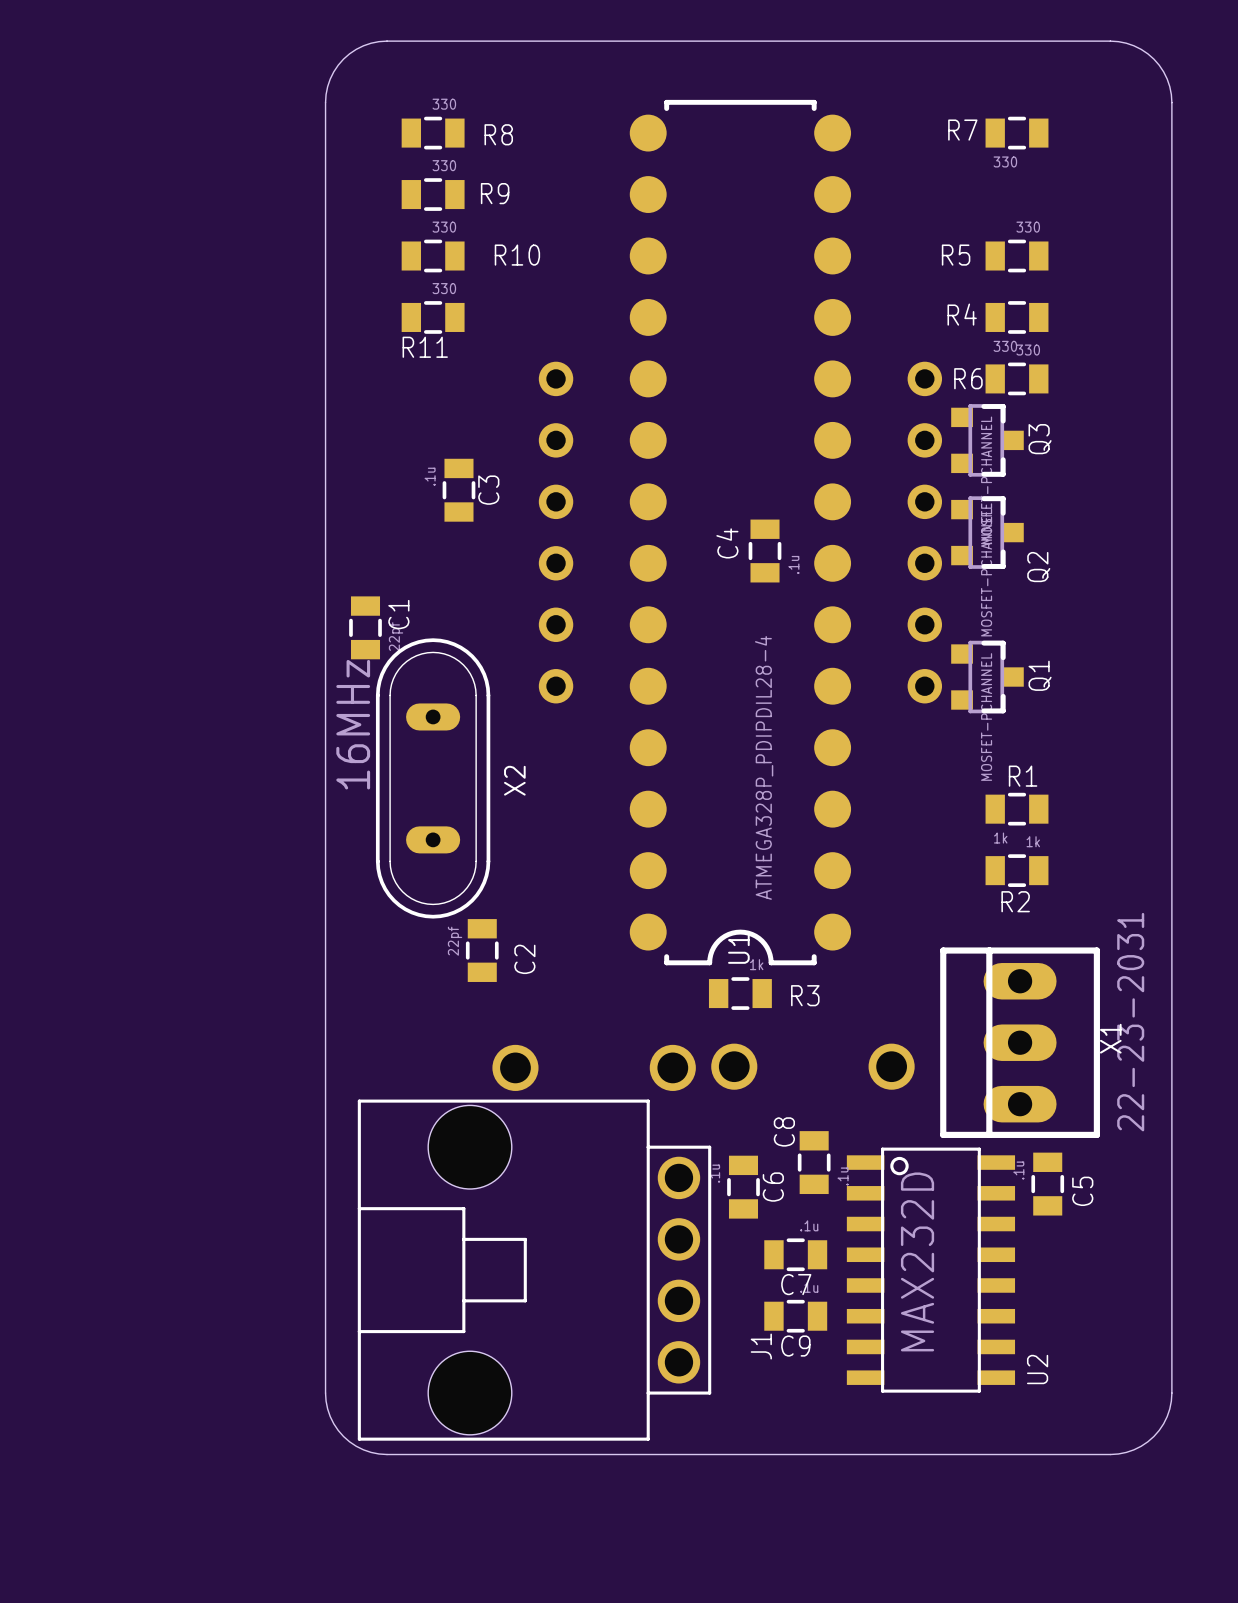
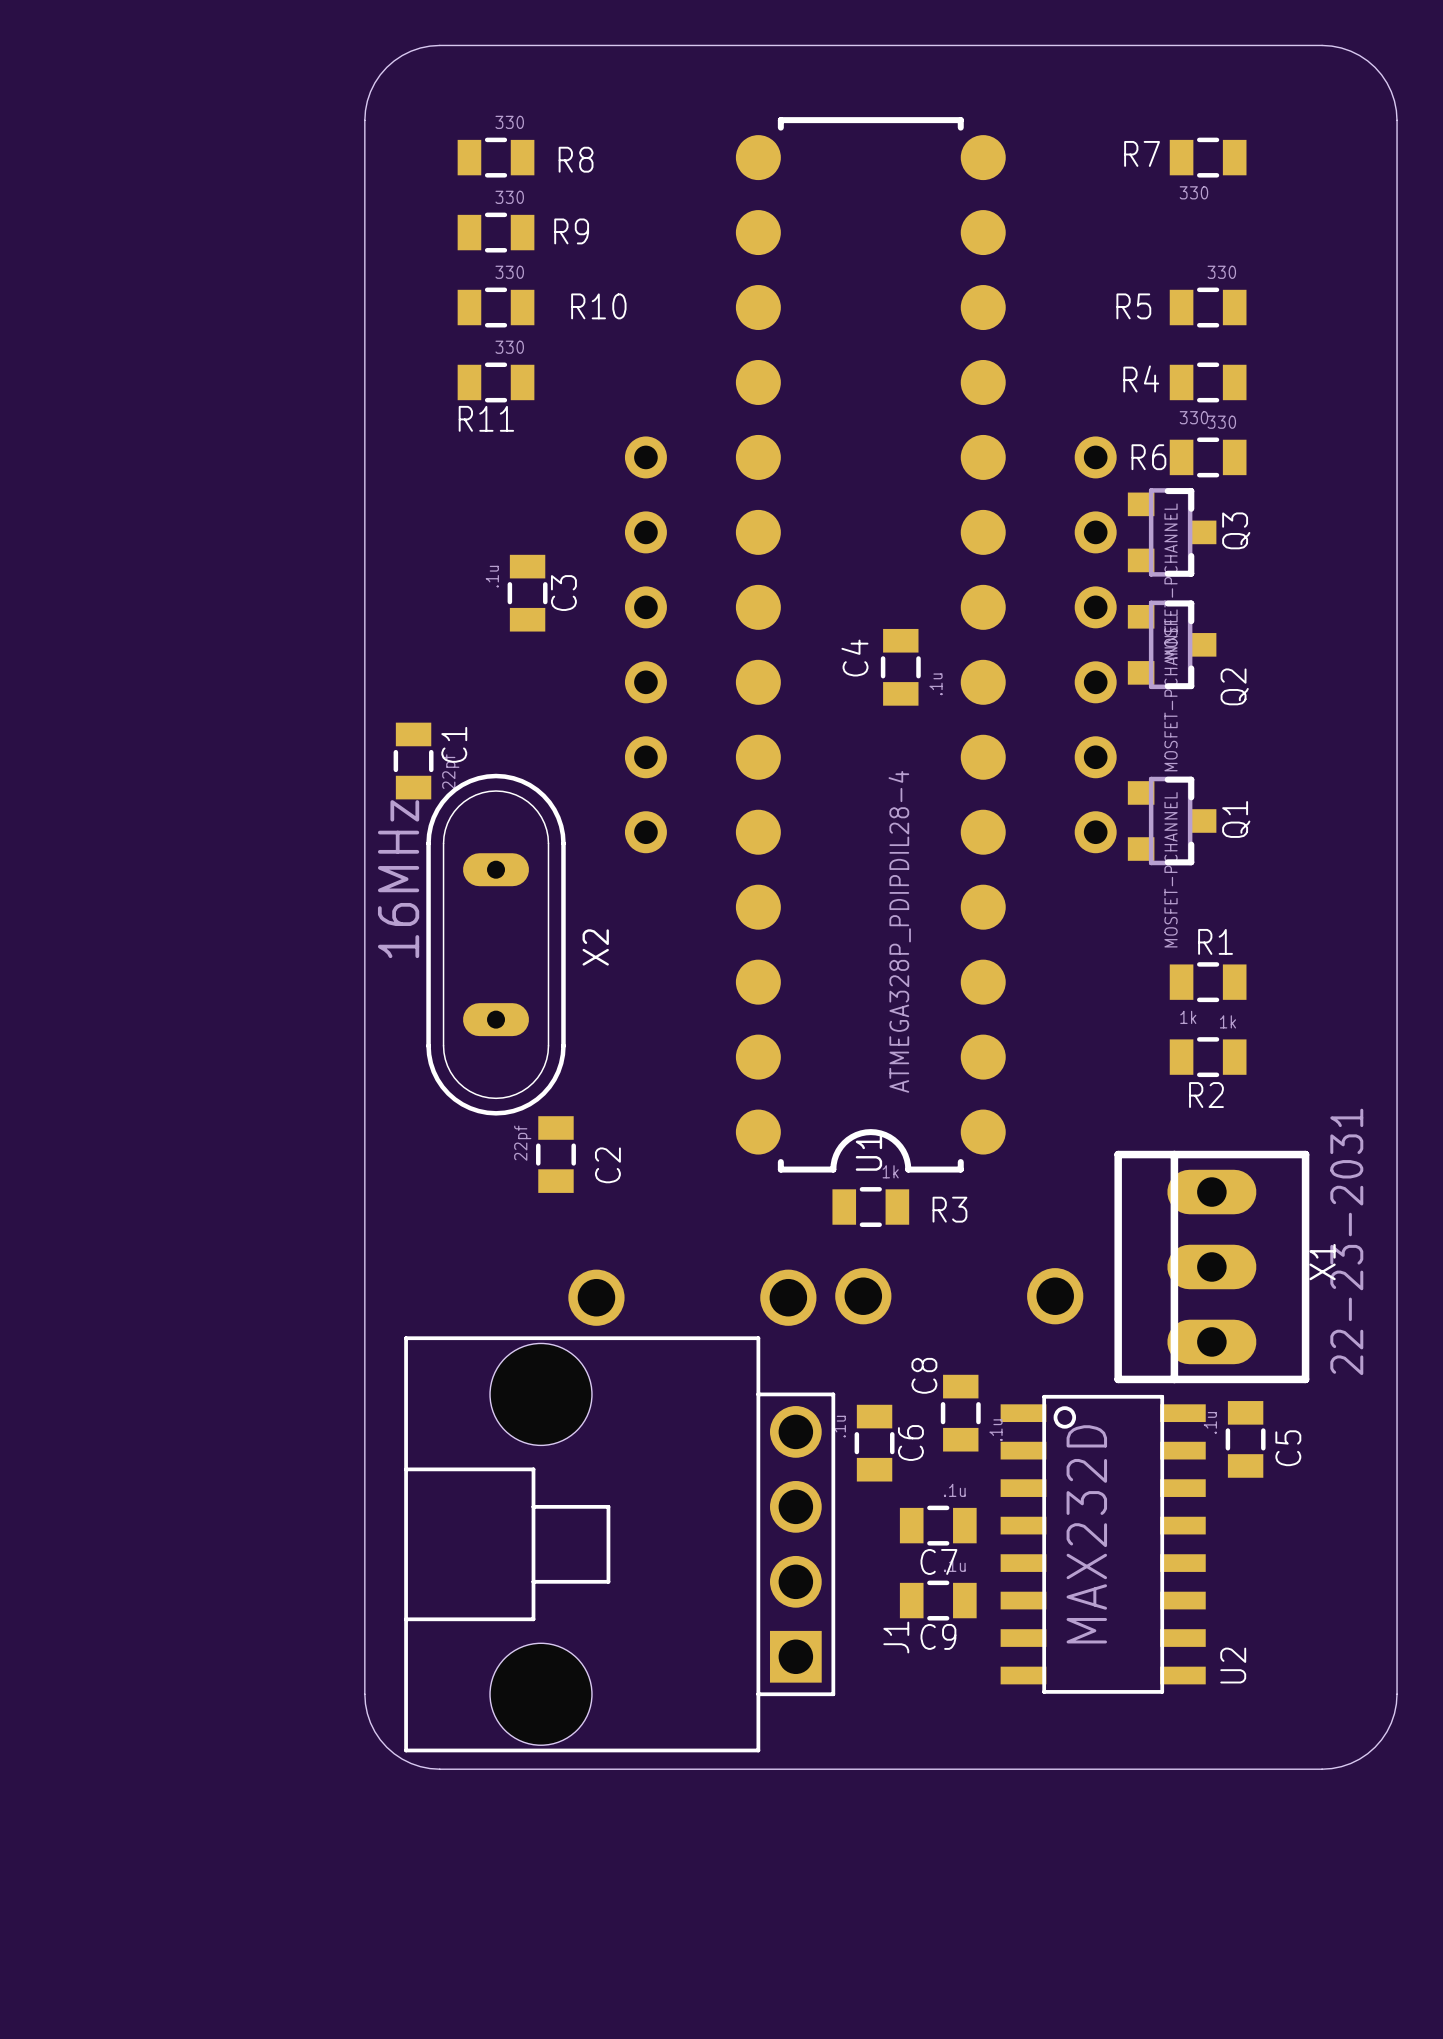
J1 footprint: [357, 1099, 712, 1441] -> [404, 1336, 836, 1753]

